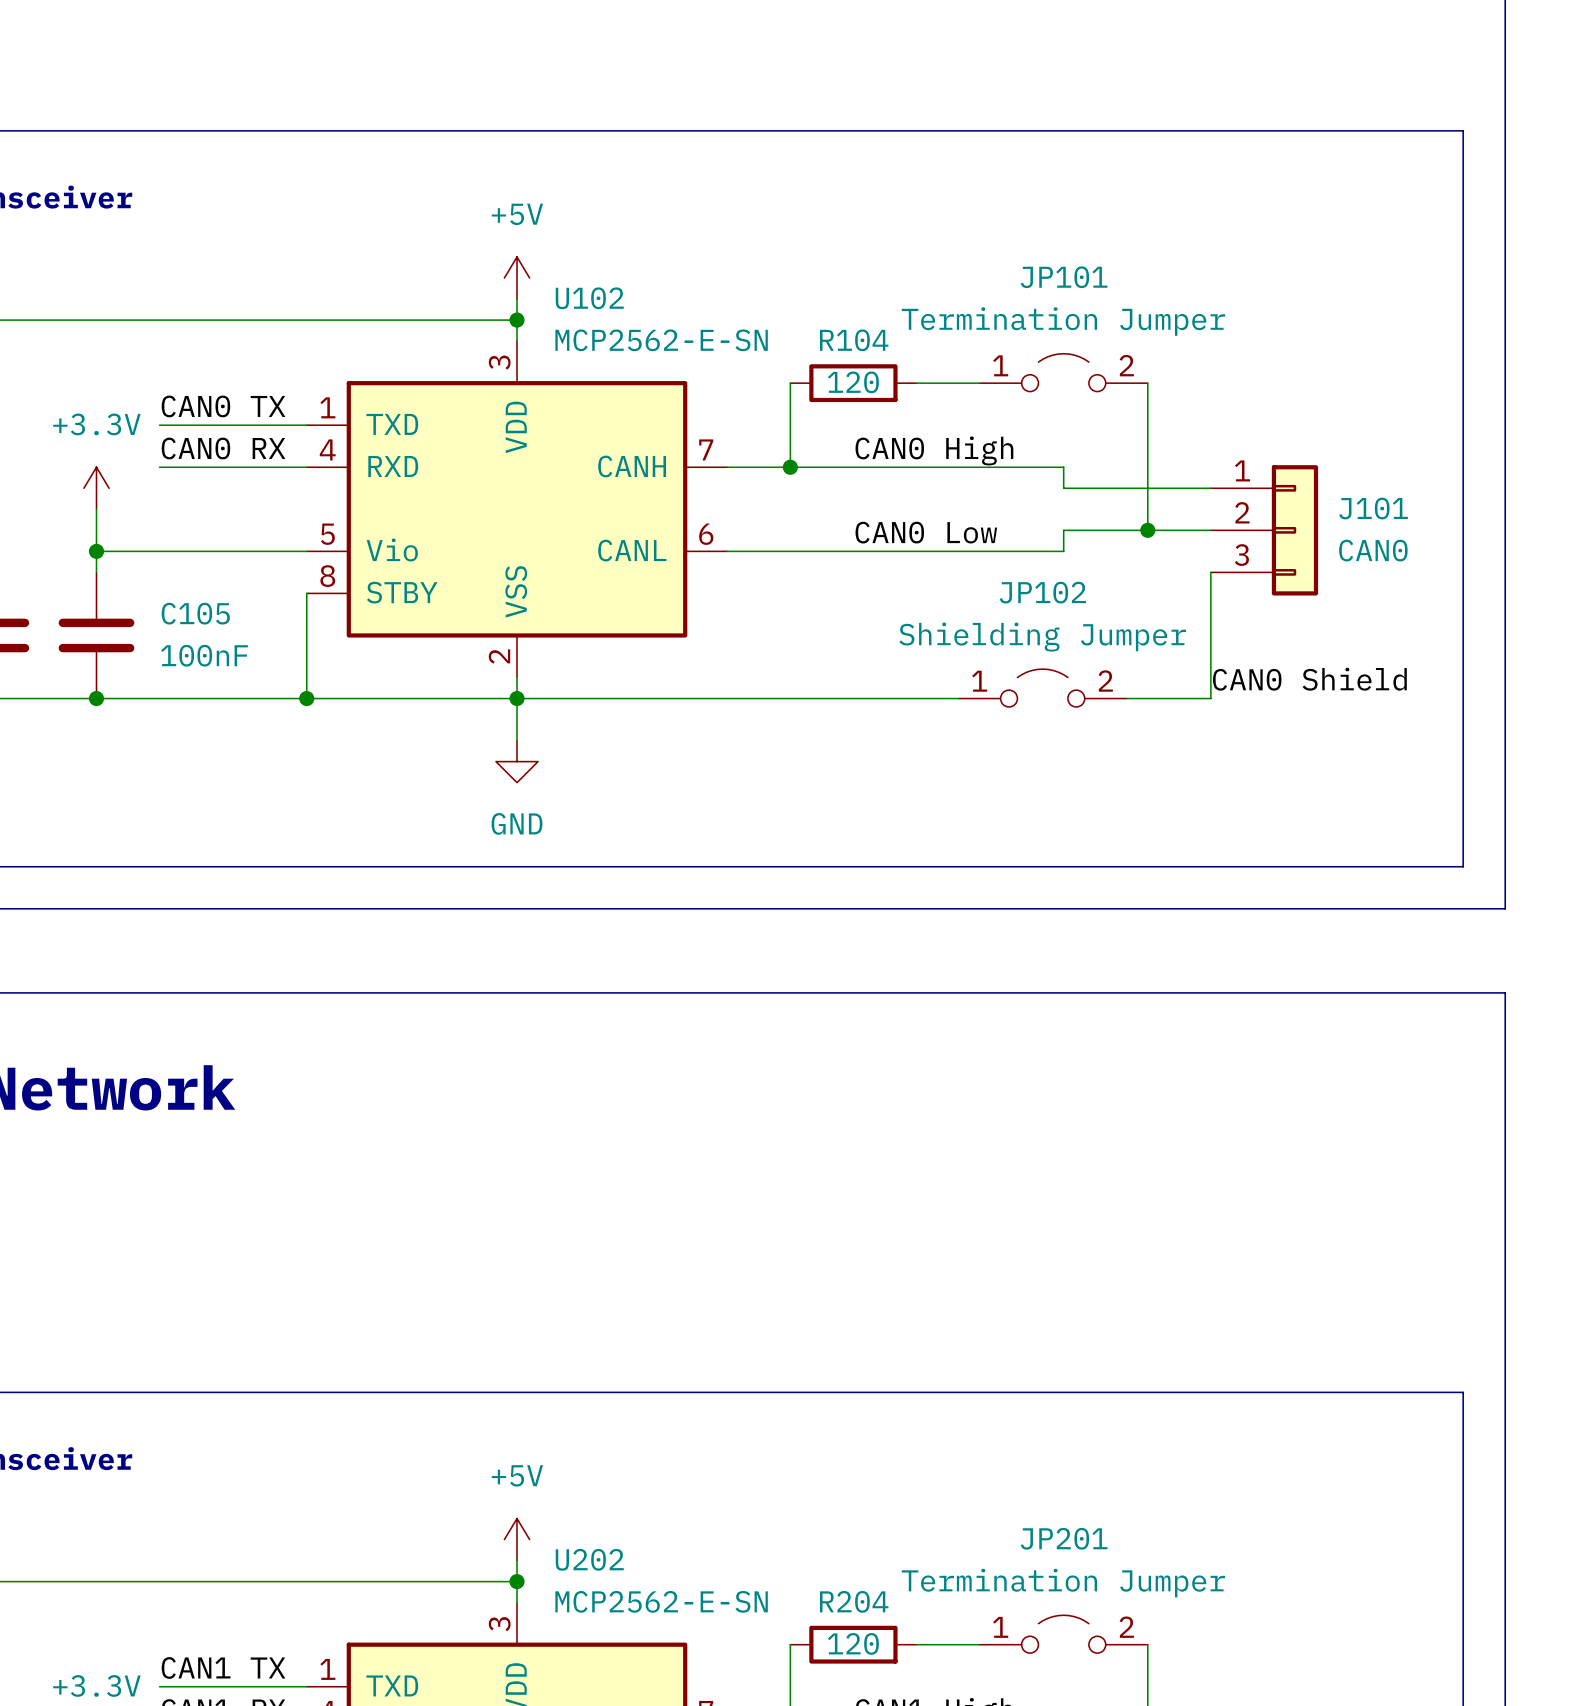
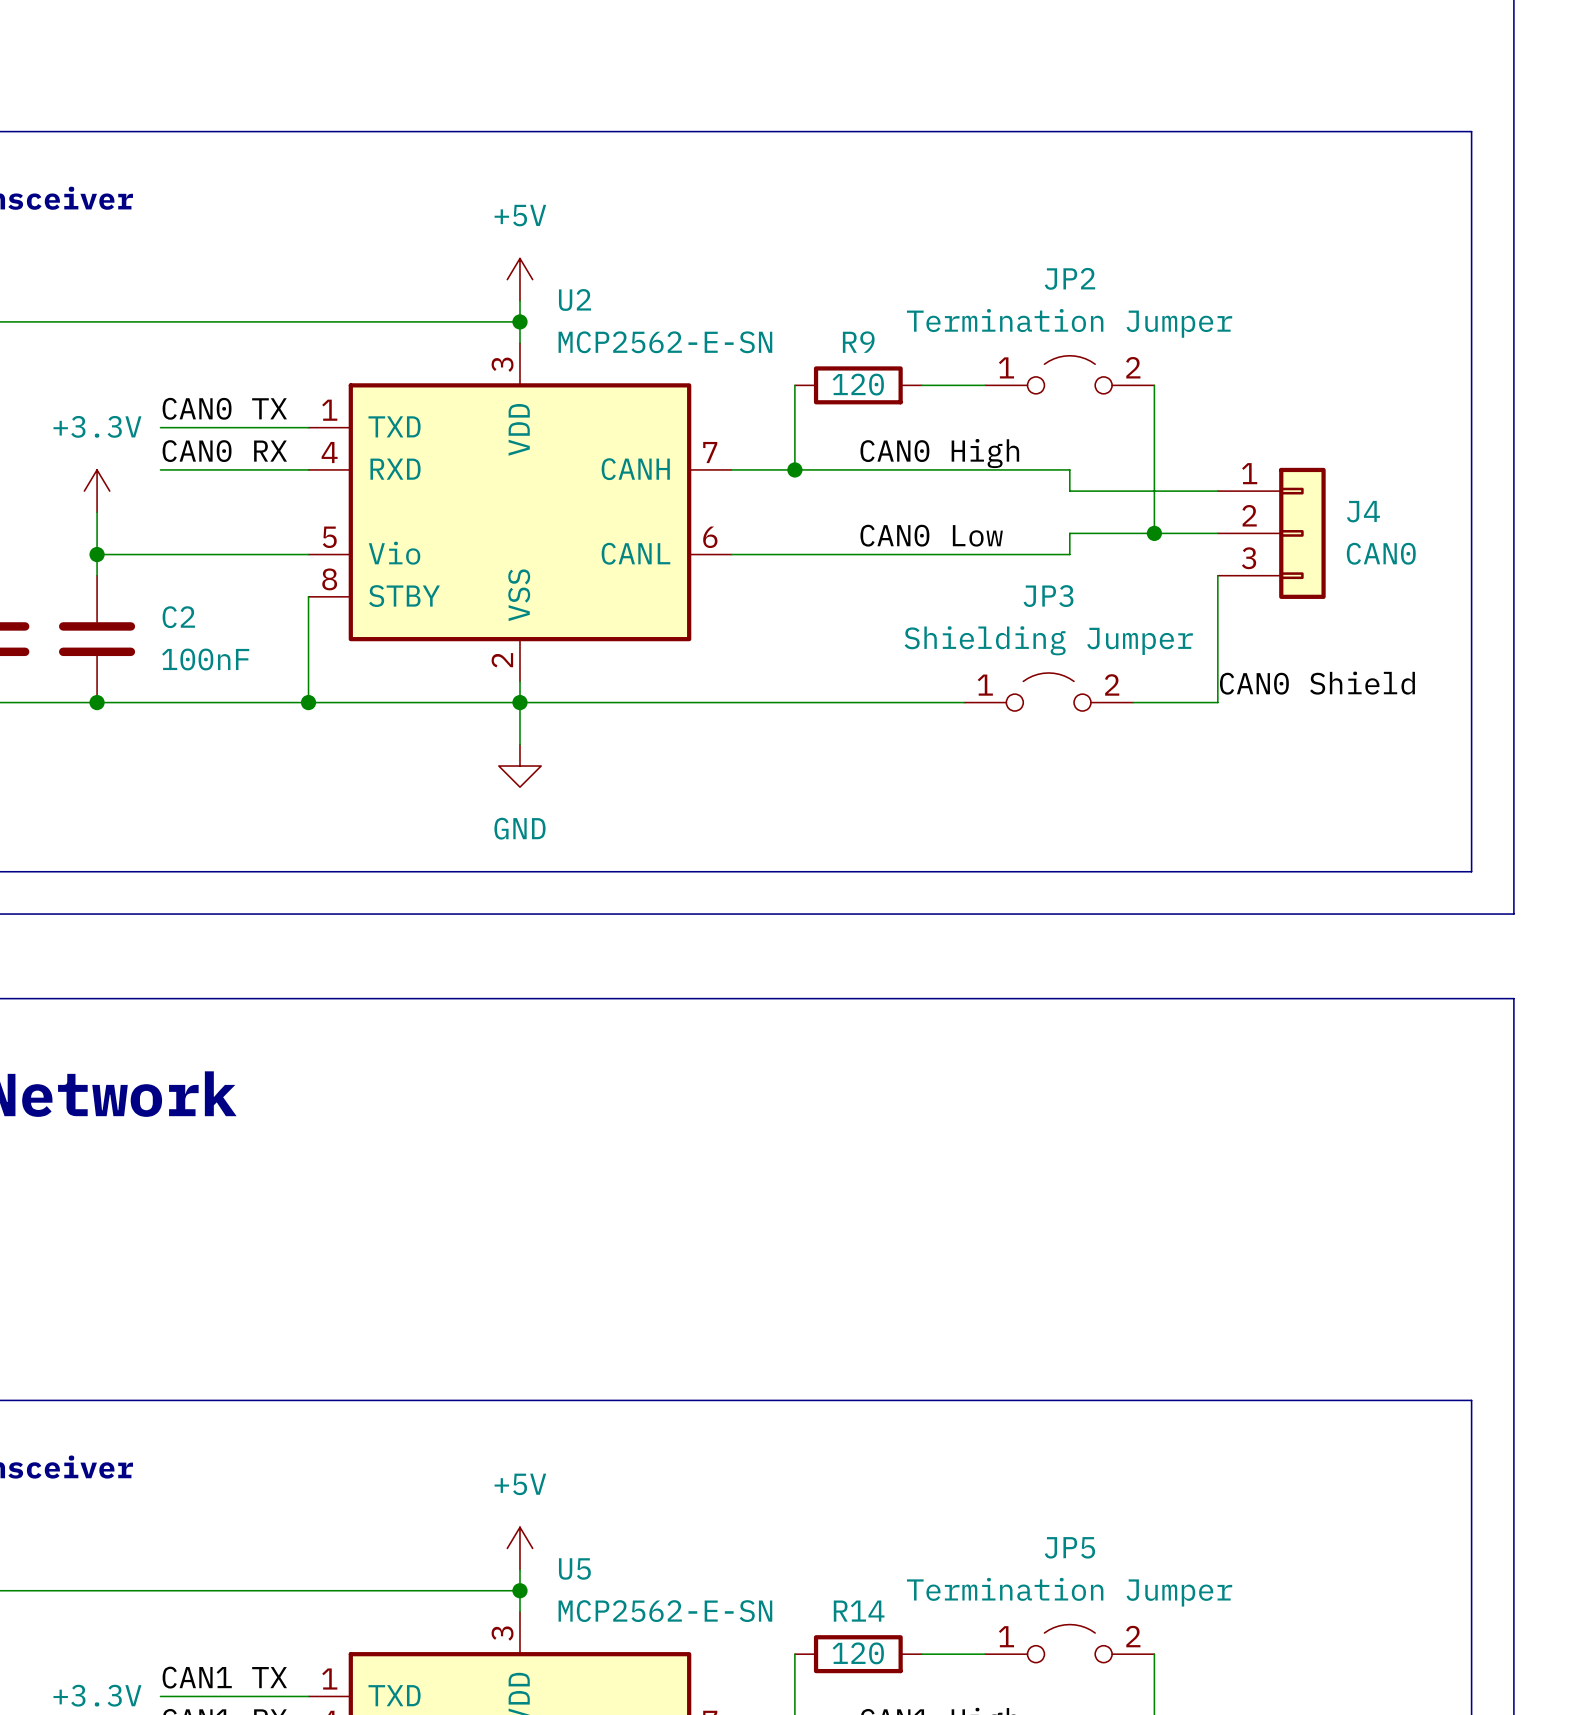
JP101 name: JP101 (1064, 277) -> JP2 (1069, 278)
U102 name: U102 (589, 298) -> U2 (574, 299)
R104 name: R104 (854, 340) -> R9 (858, 342)
J101 name: J101 (1373, 508) -> J4 (1363, 511)
JP102 name: JP102 (1042, 592) -> JP3 (1048, 596)
C105 name: C105 (195, 613) -> C2 (178, 617)
JP201 name: JP201 (1064, 1538) -> JP5 (1069, 1547)
U202 name: U202 (589, 1559) -> U5 (574, 1568)
R204 name: R204 (854, 1601) -> R14 (859, 1611)

